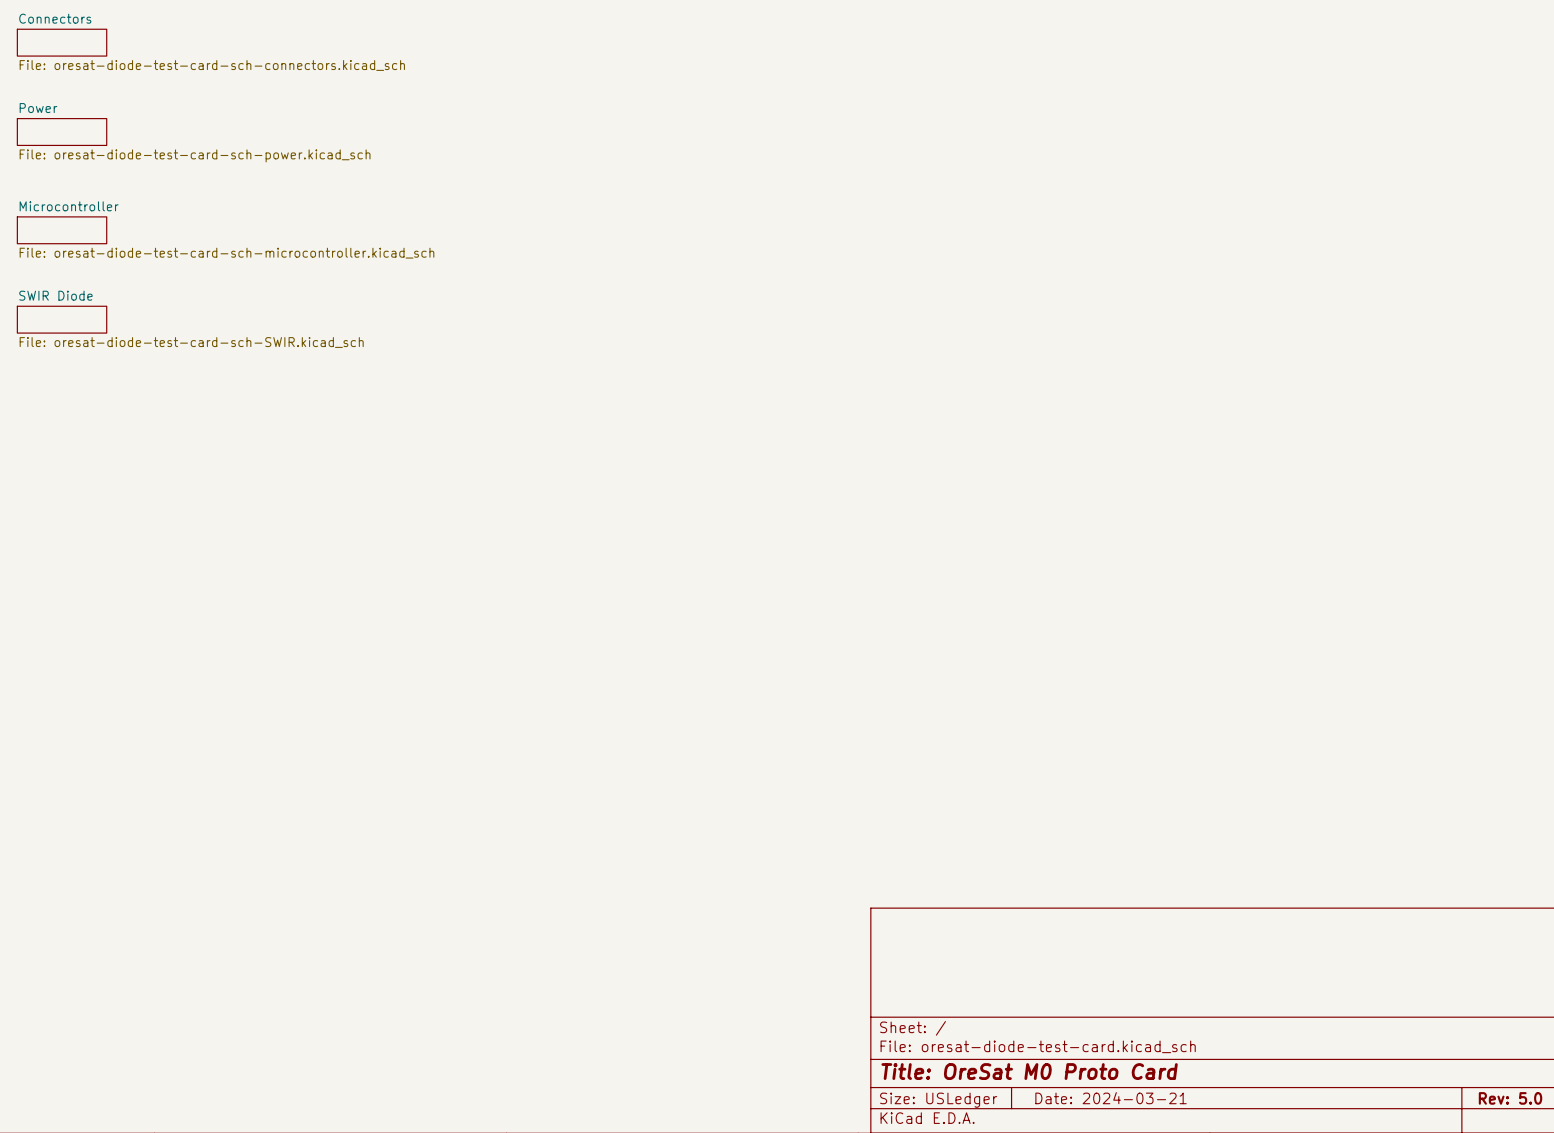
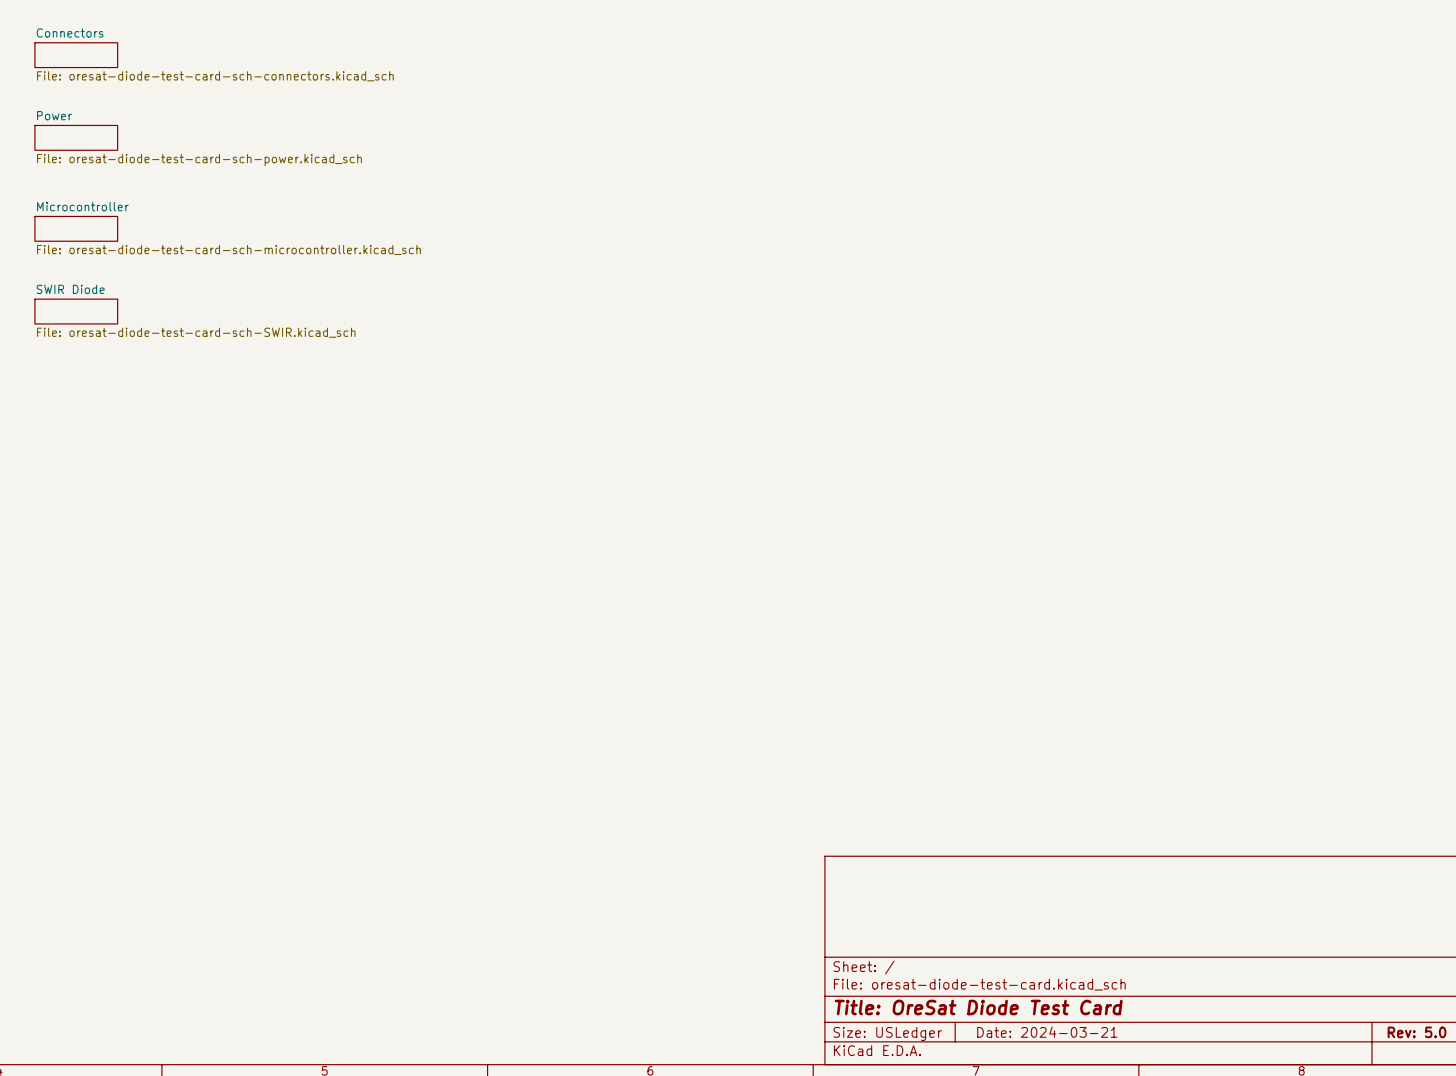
title block: Title: OreSat M0 Proto Card (1029, 1071) -> Title: OreSat Diode Test Card (978, 1007)

